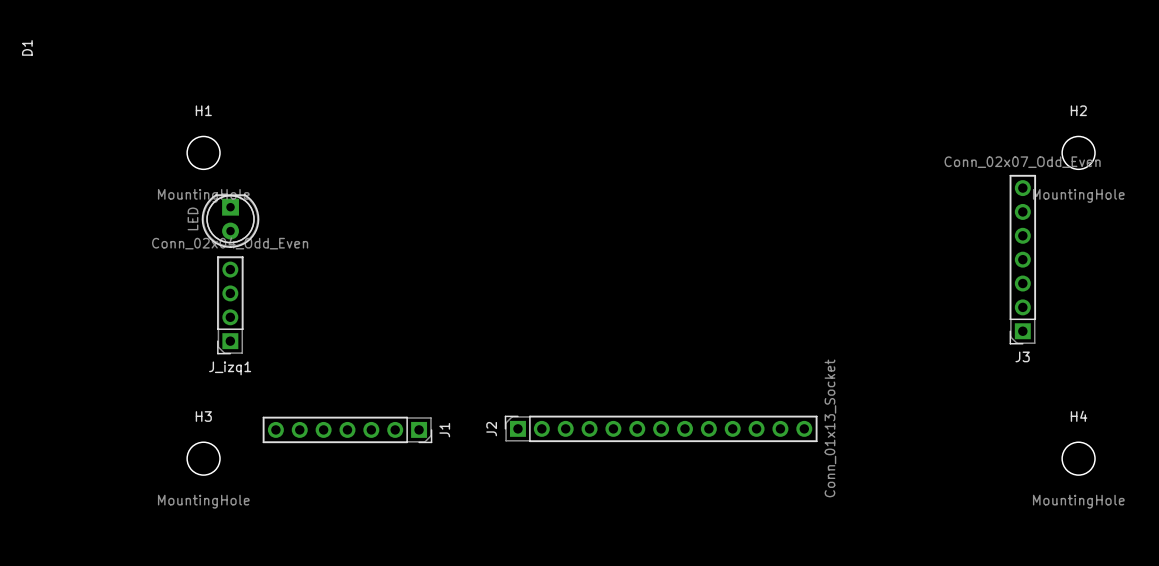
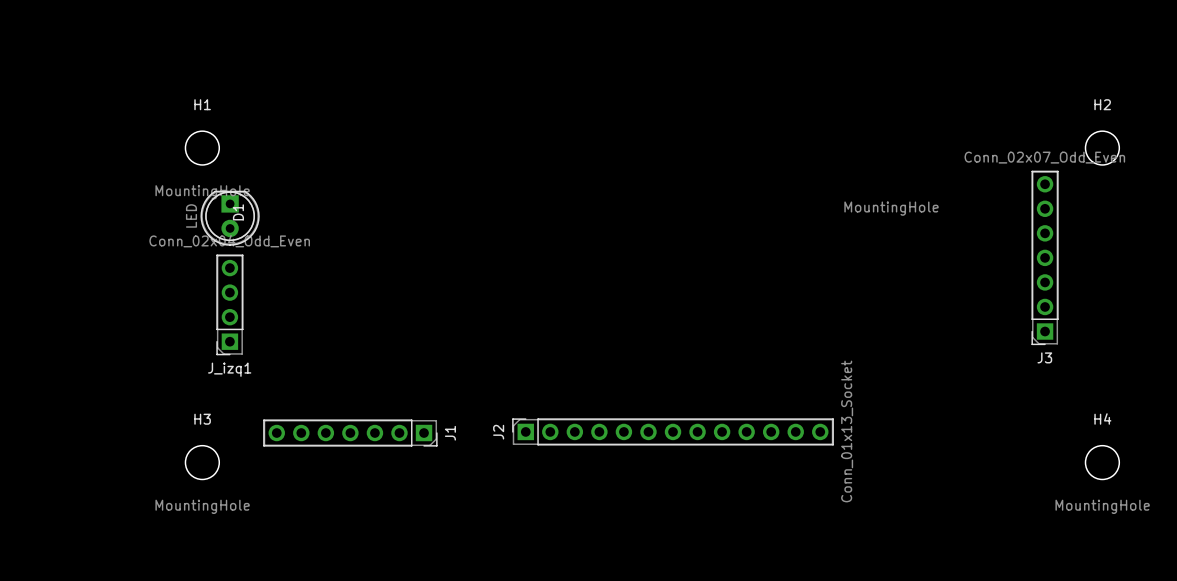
D1 name position: D1 (27, 47) -> D1 (238, 212)
H2 value position: MountingHole (1078, 195) -> MountingHole (891, 208)

